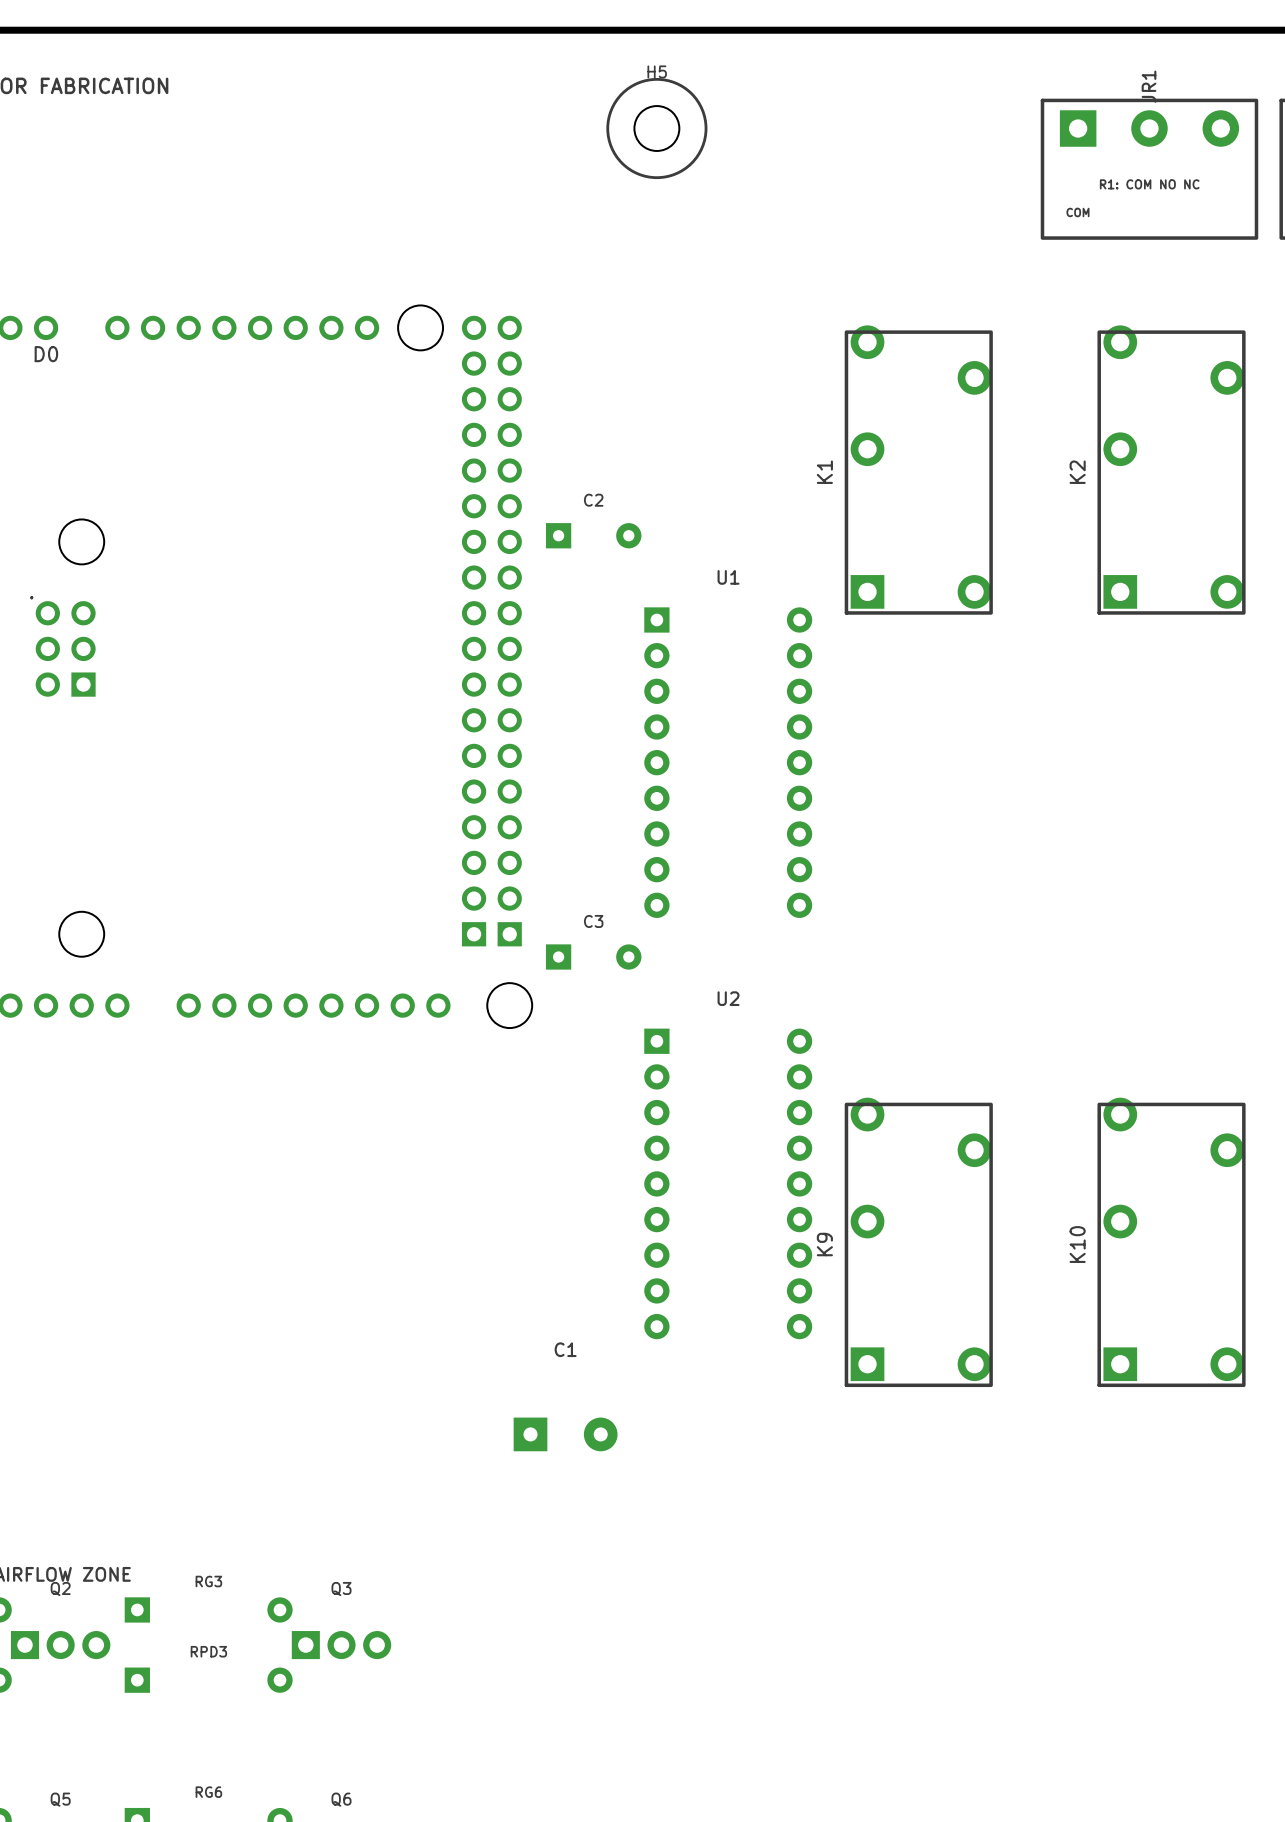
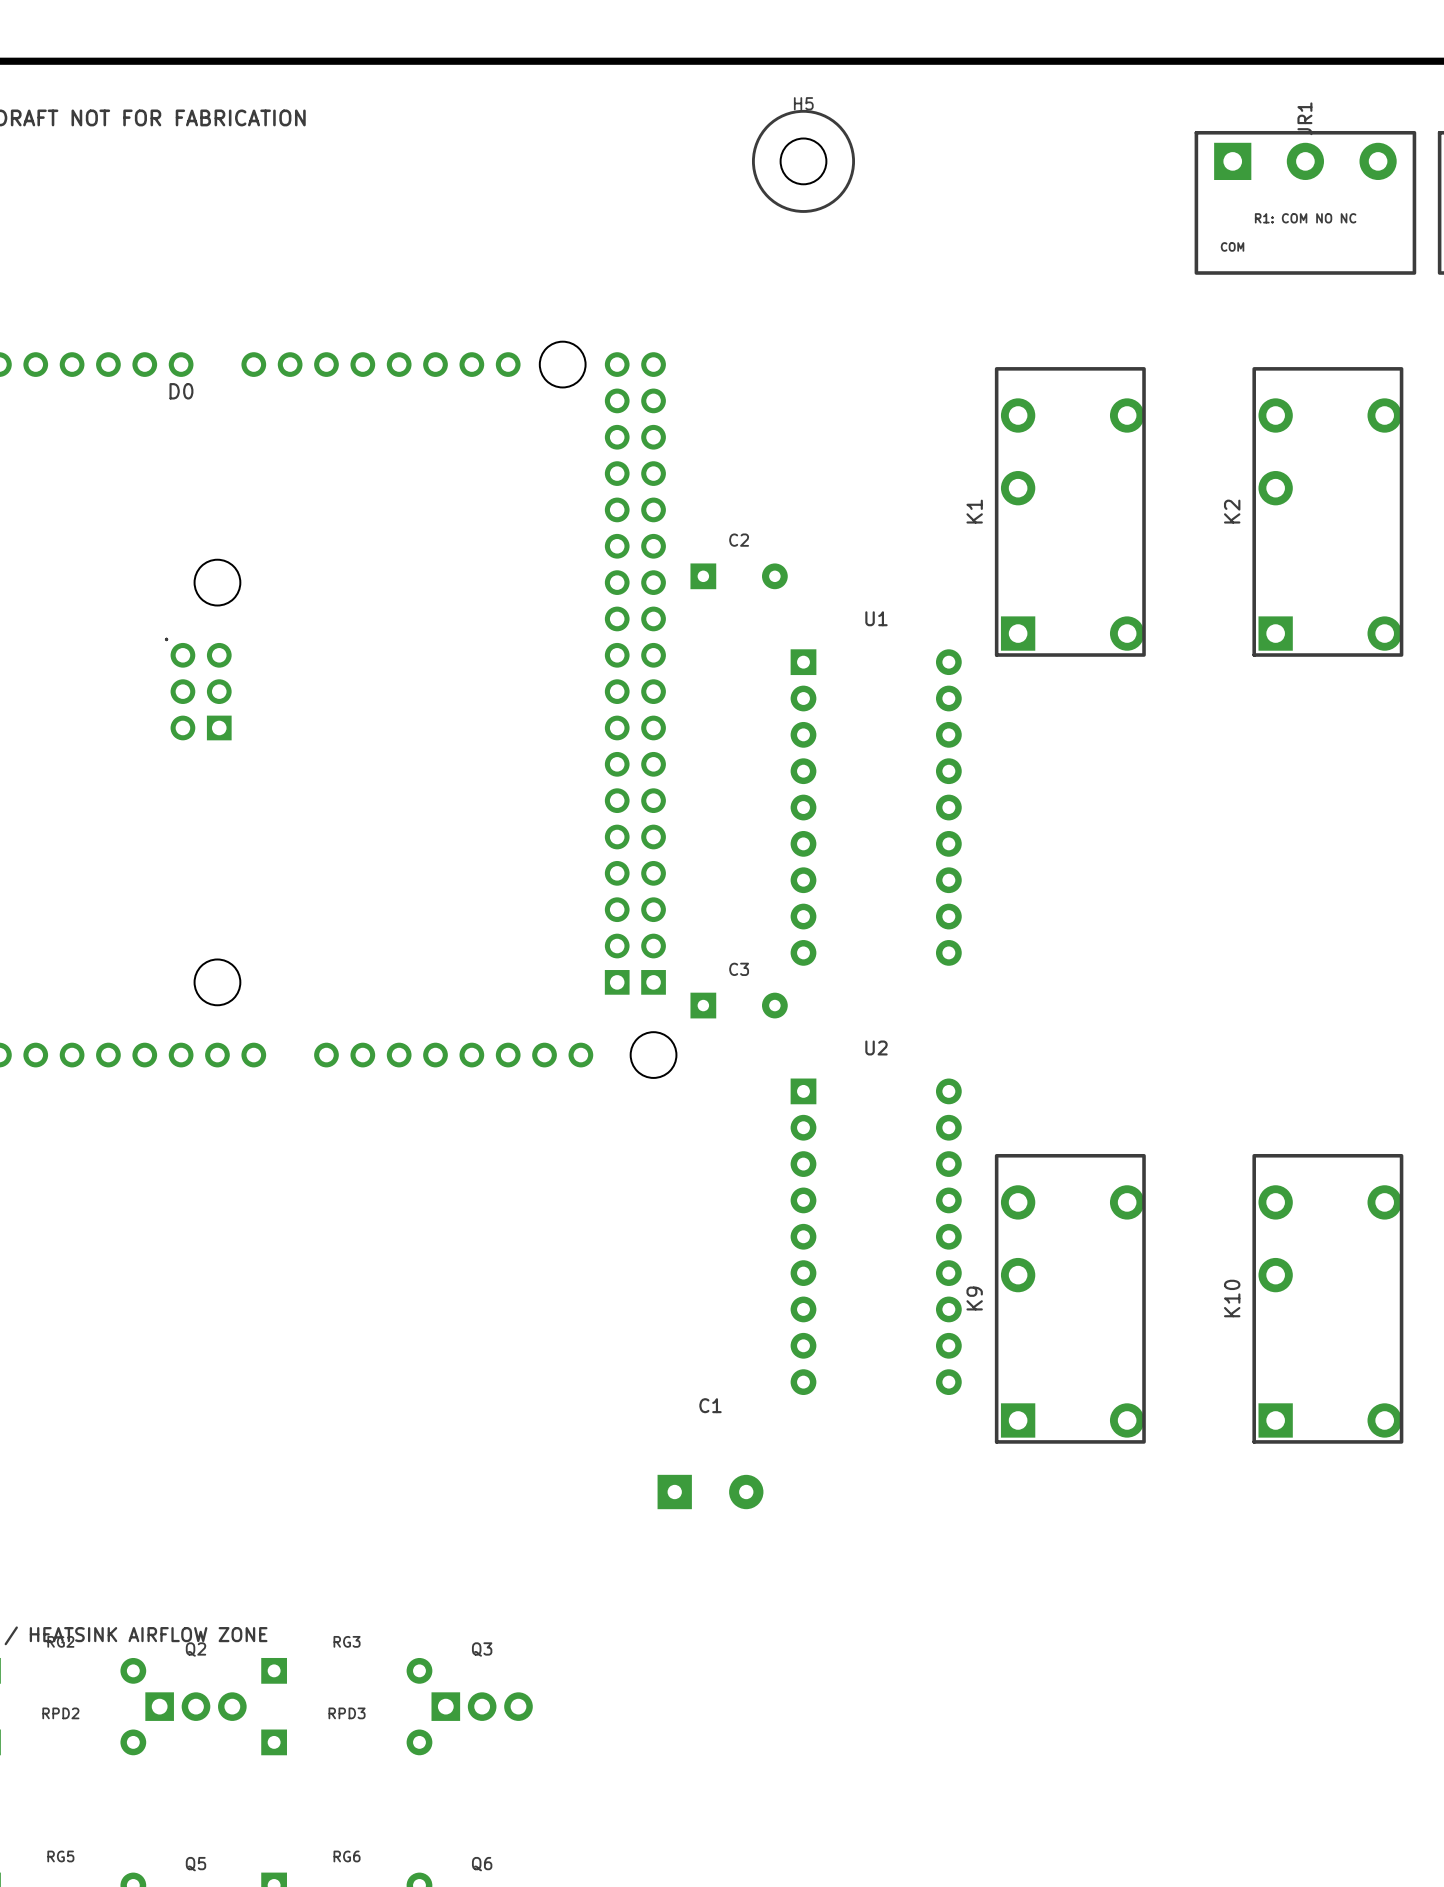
K1 footprint: [844, 325, 993, 615] -> [994, 367, 1146, 657]
K2 footprint: [1097, 325, 1246, 615] -> [1252, 367, 1404, 657]
K9 footprint: [844, 1097, 993, 1388] -> [994, 1153, 1146, 1444]
K10 footprint: [1097, 1097, 1246, 1388] -> [1252, 1153, 1404, 1444]

